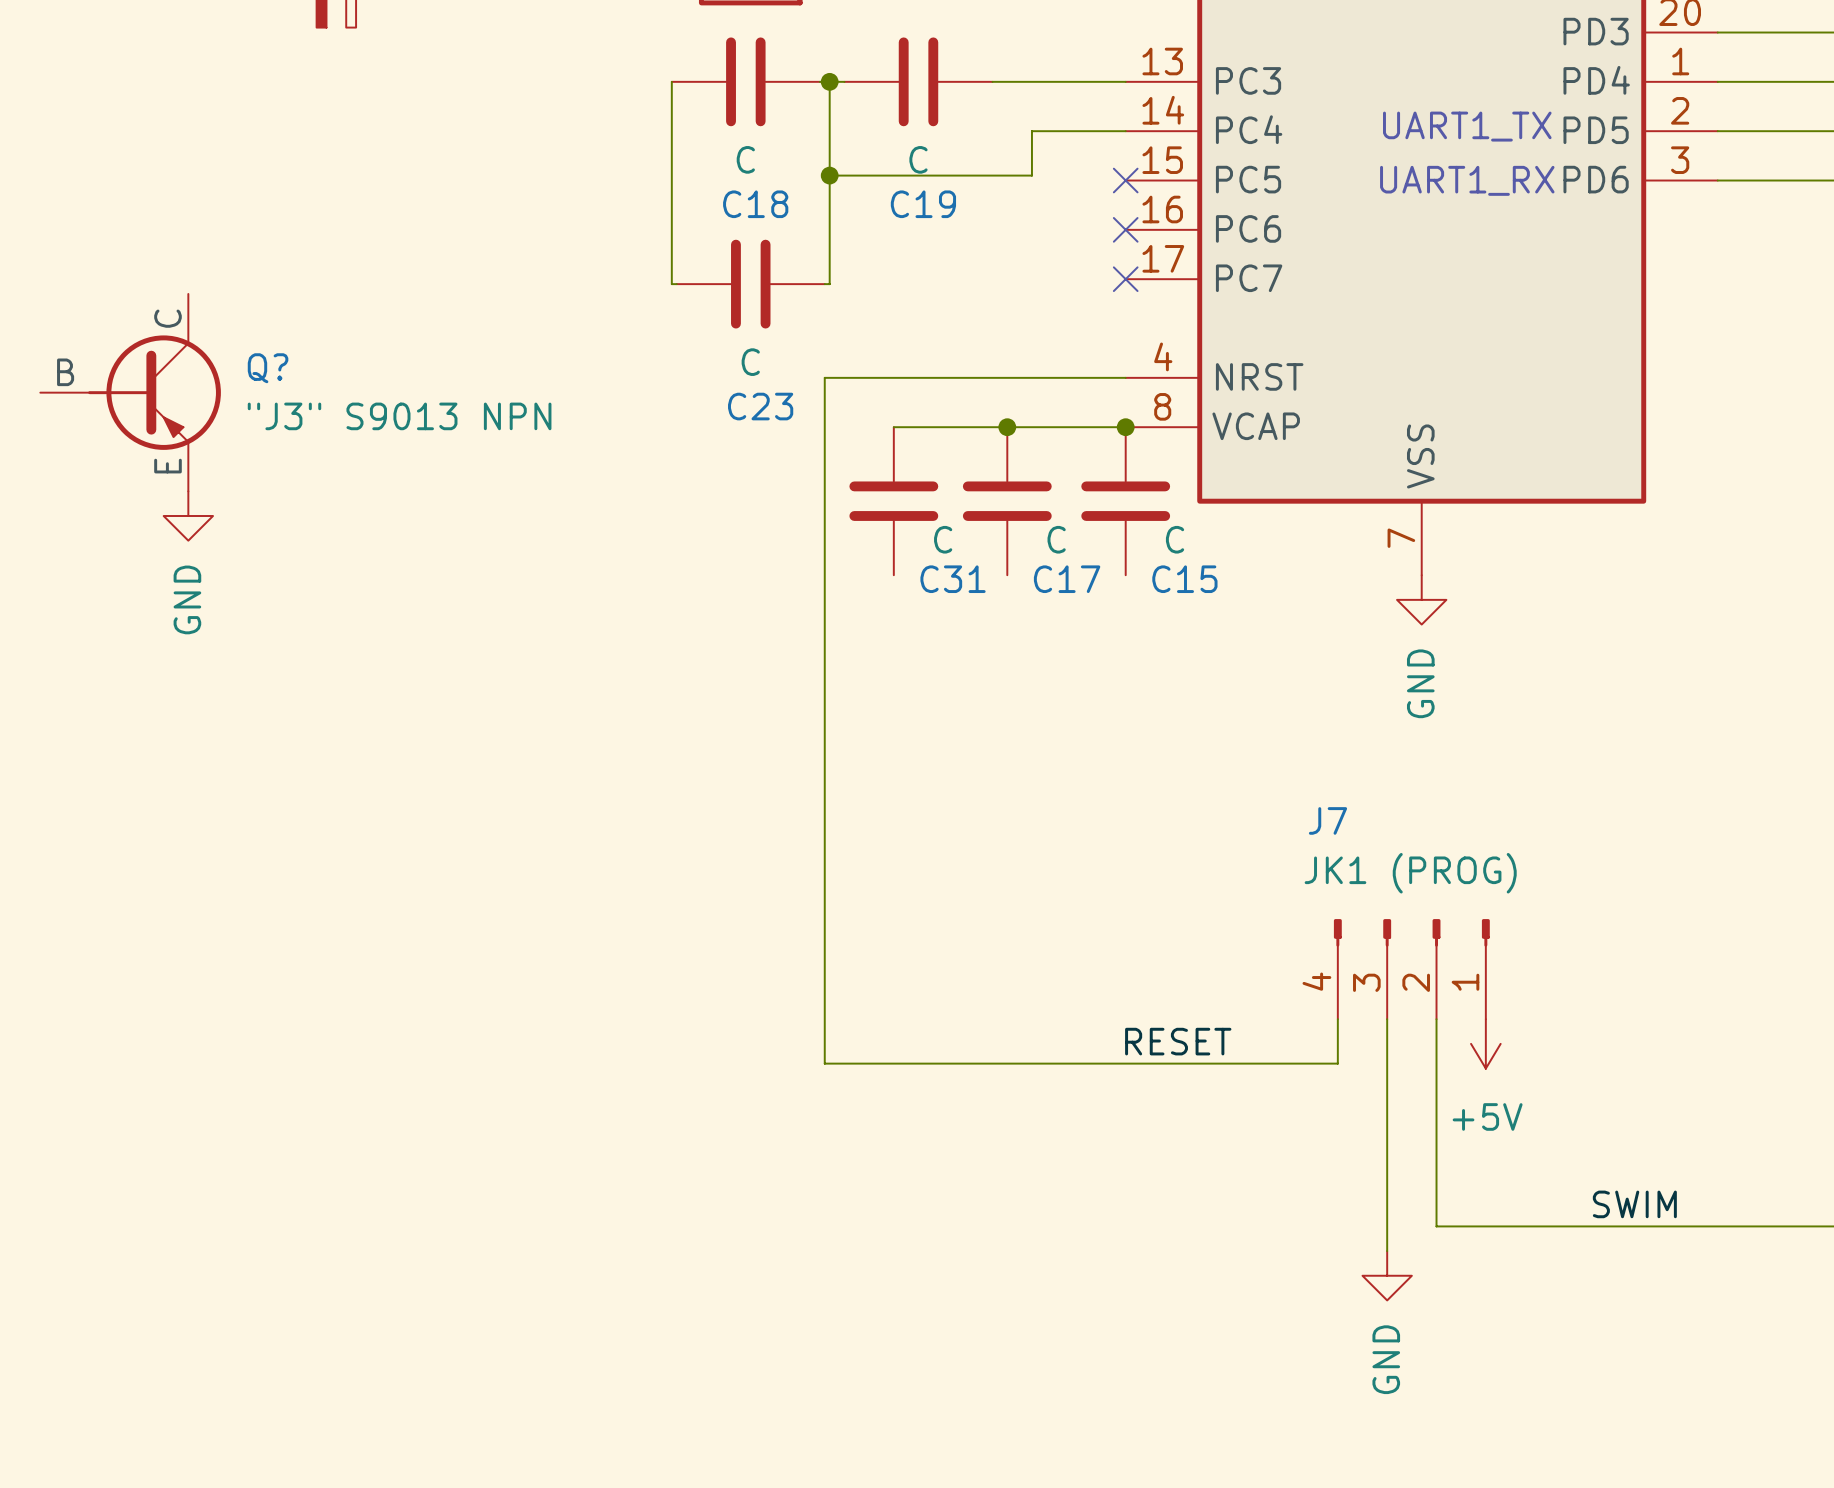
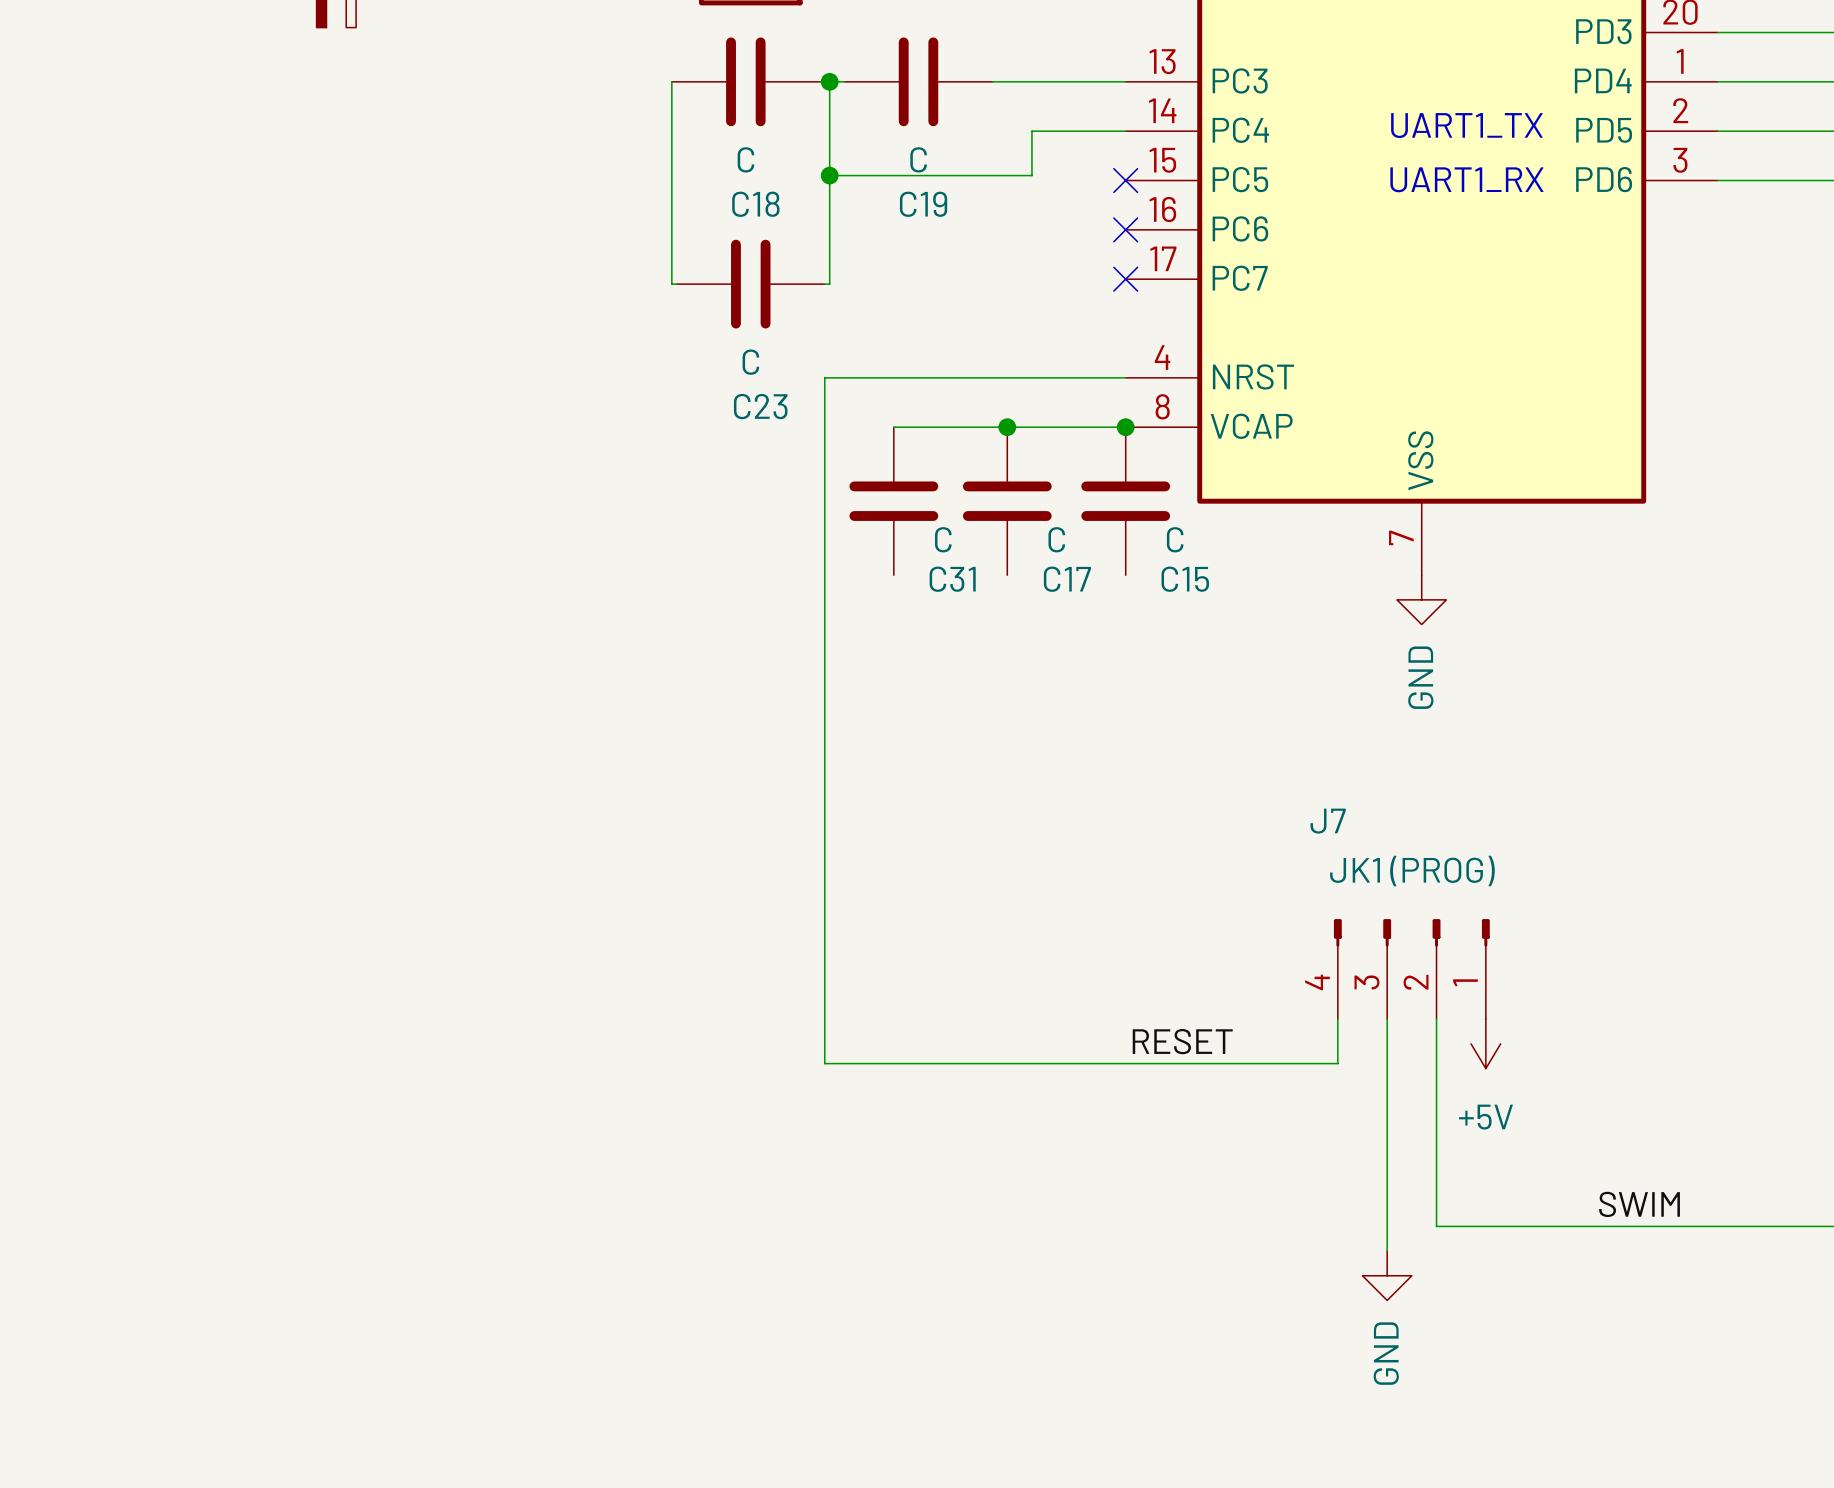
Q?: "J3" S9013 NPN (130, 392) -> none
power symbol: GND (188, 516) -> none

